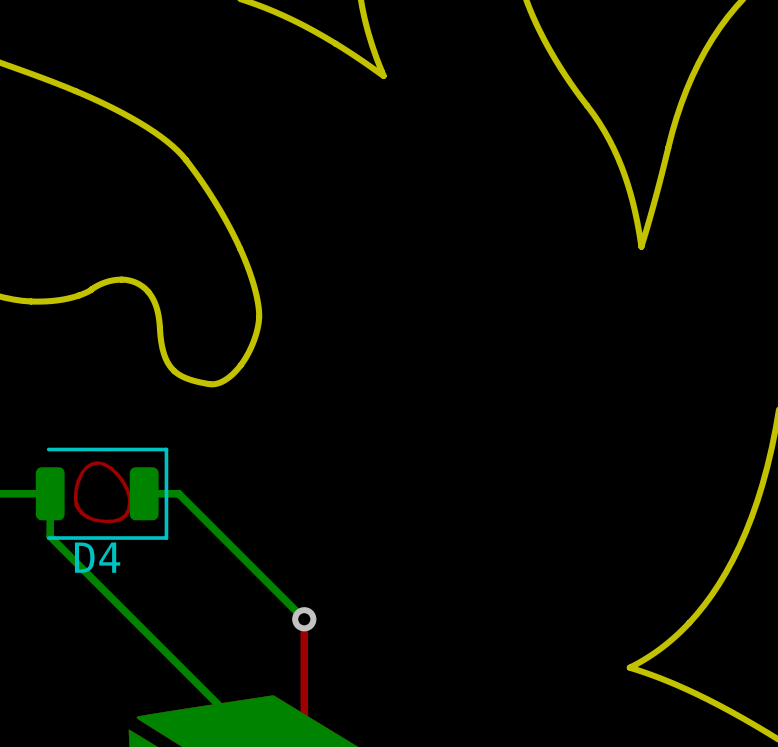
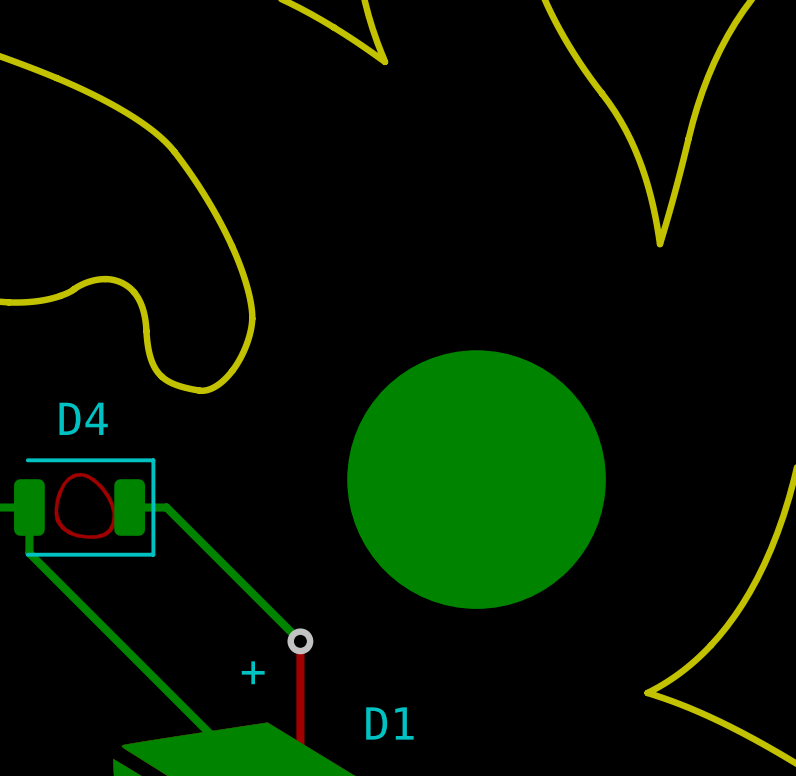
part: none -> (476, 479)
D4 name position: D4 (97, 557) -> D4 (83, 418)
text: none -> + (253, 672)
text: none -> D1 (389, 723)

